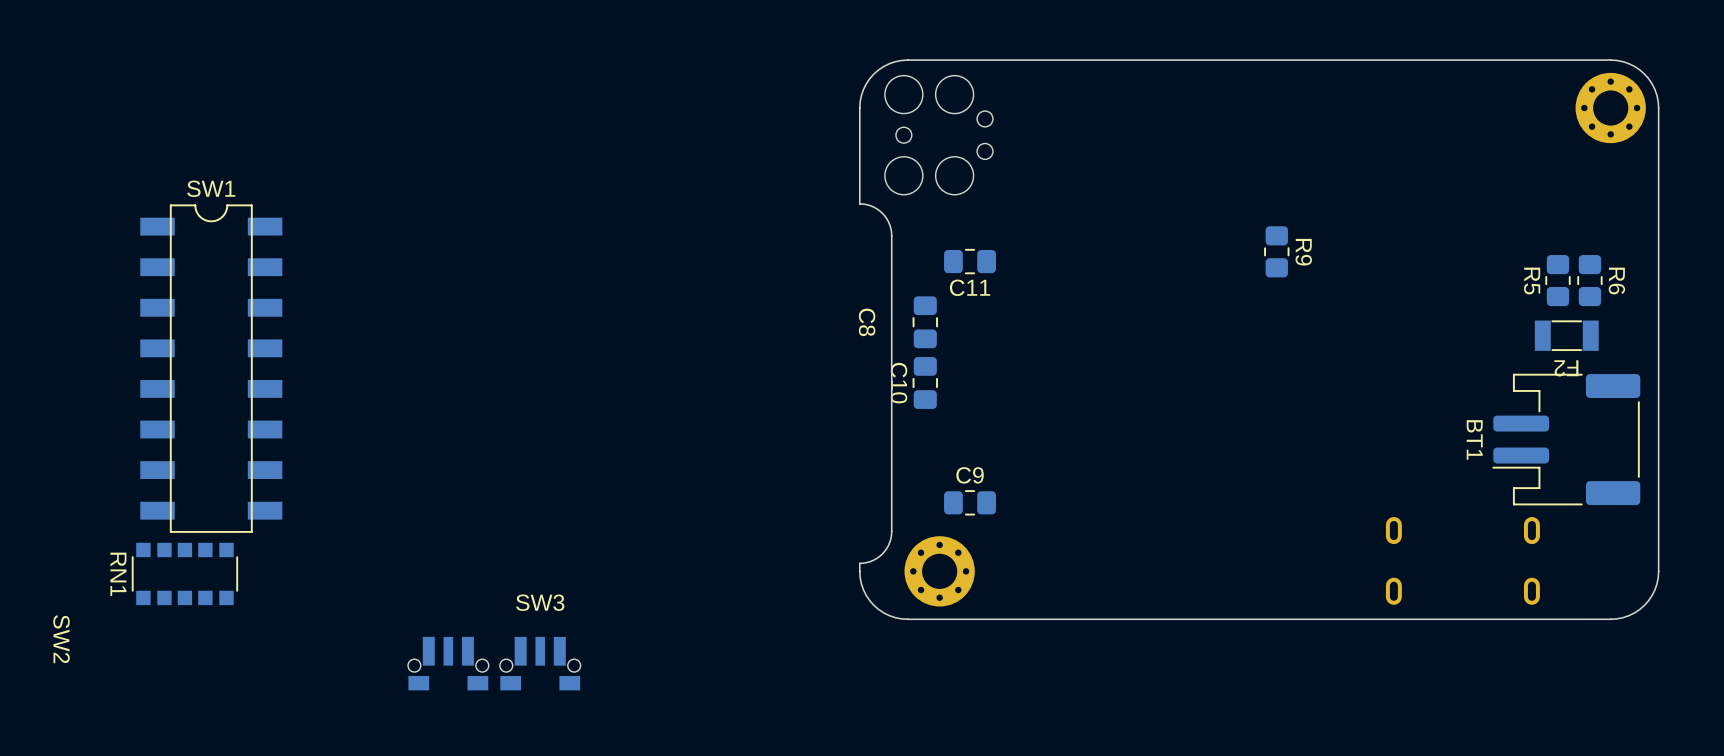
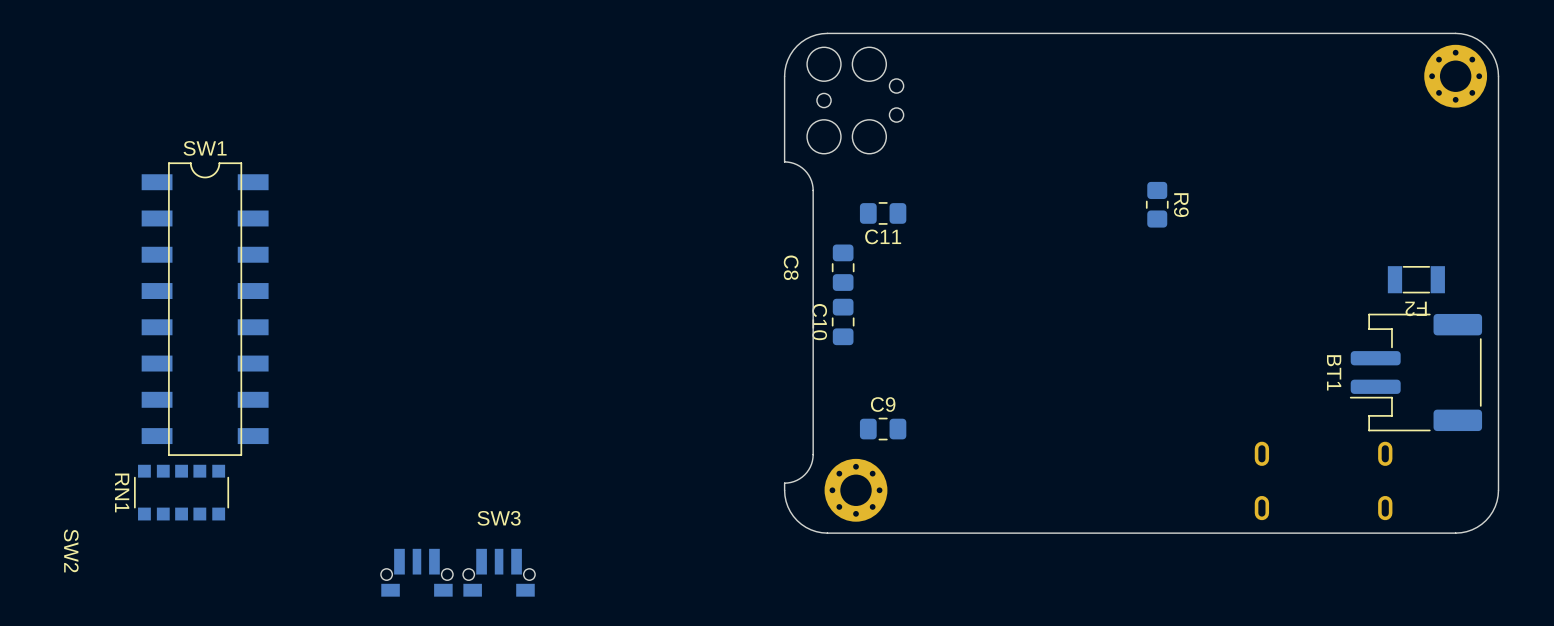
R5: (1557, 280) -> none
R6: (1589, 280) -> none

